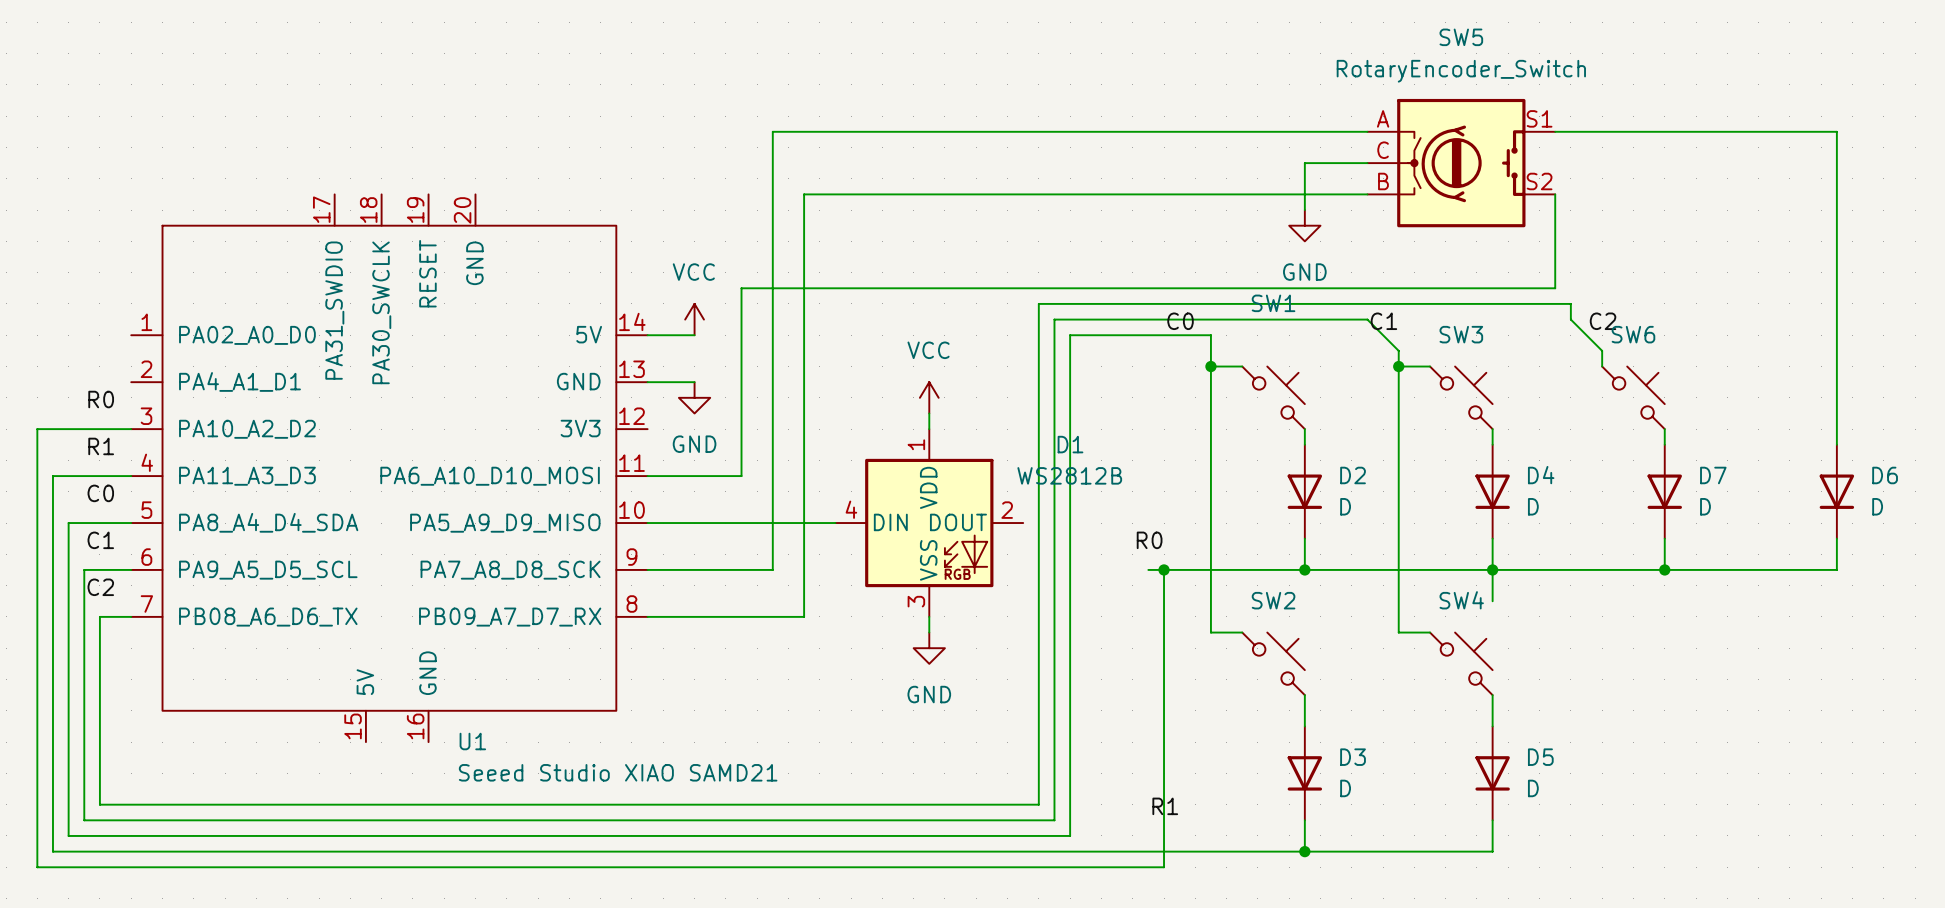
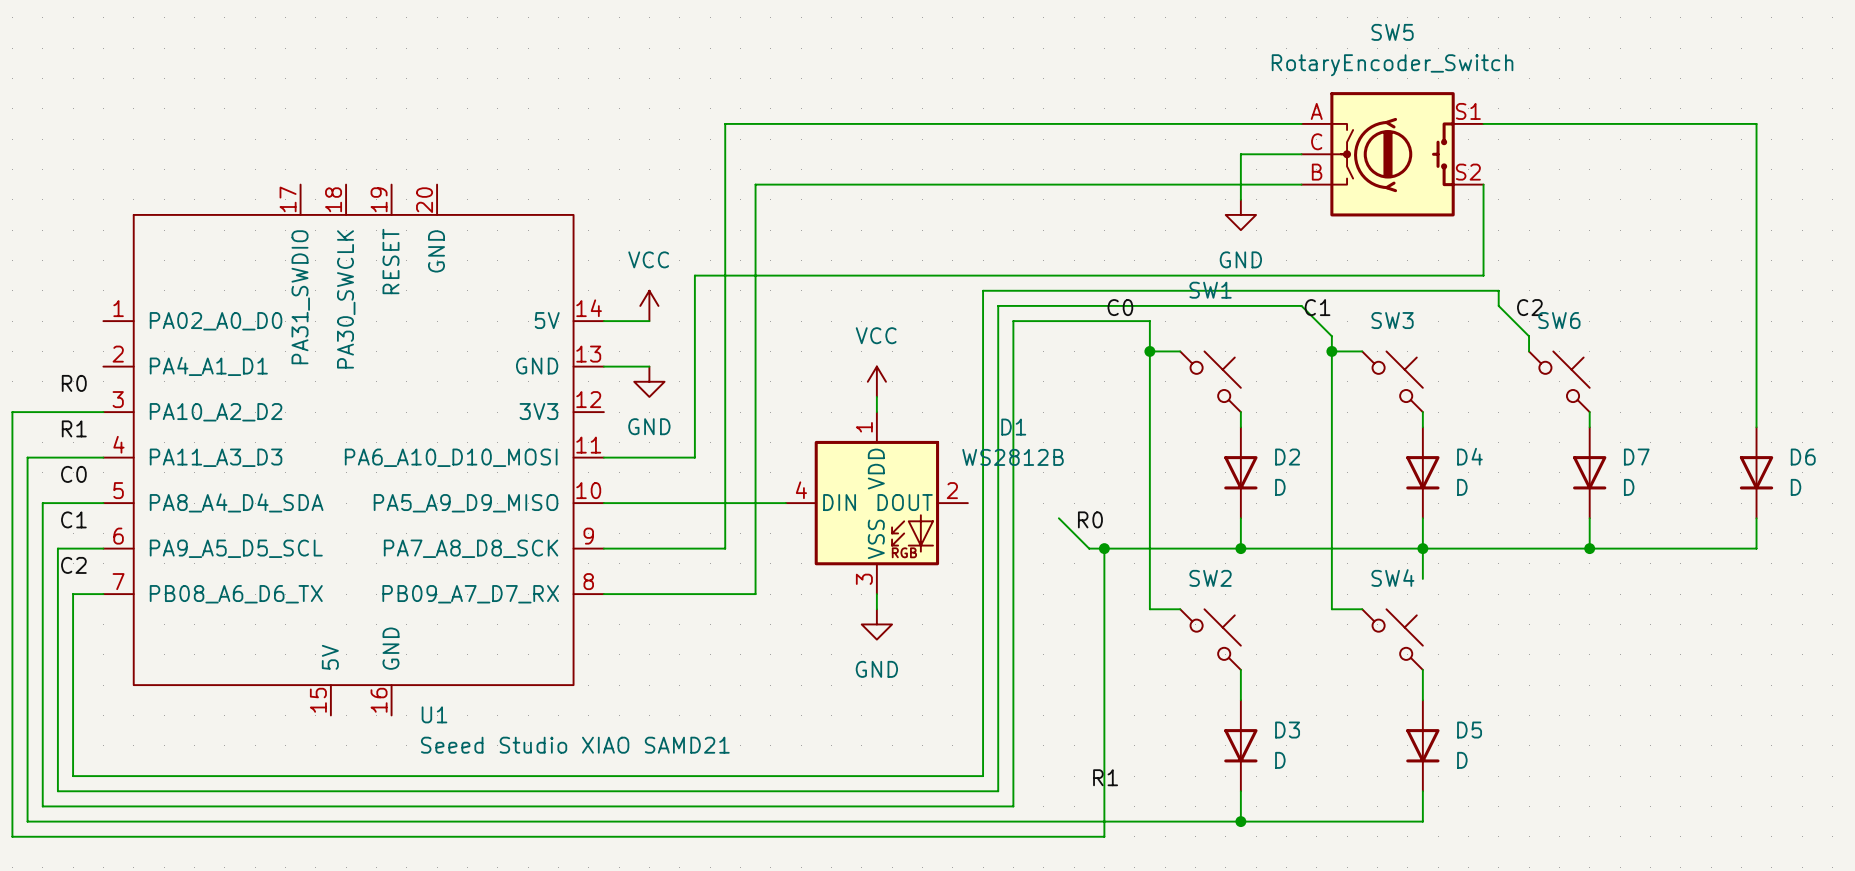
wire: none -> (1058, 518) (1089, 548)

